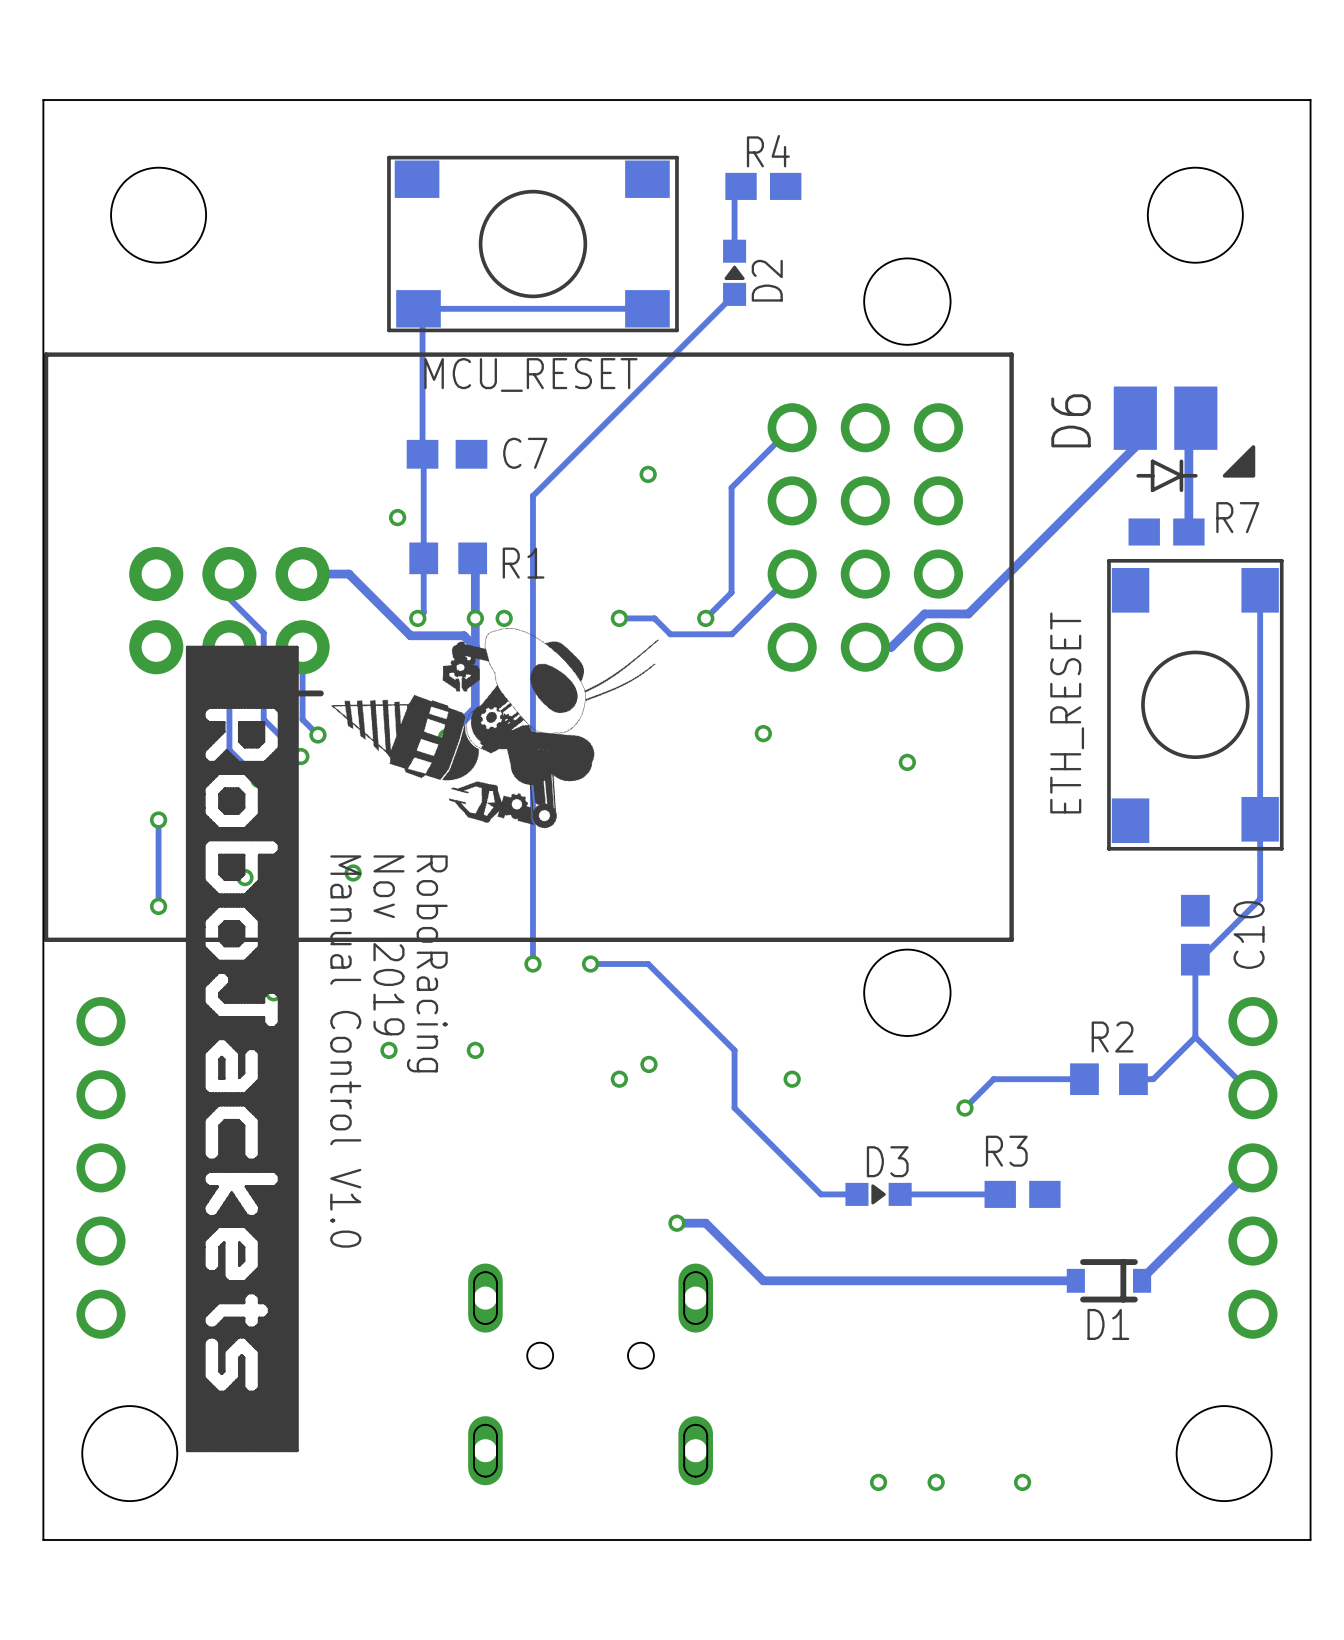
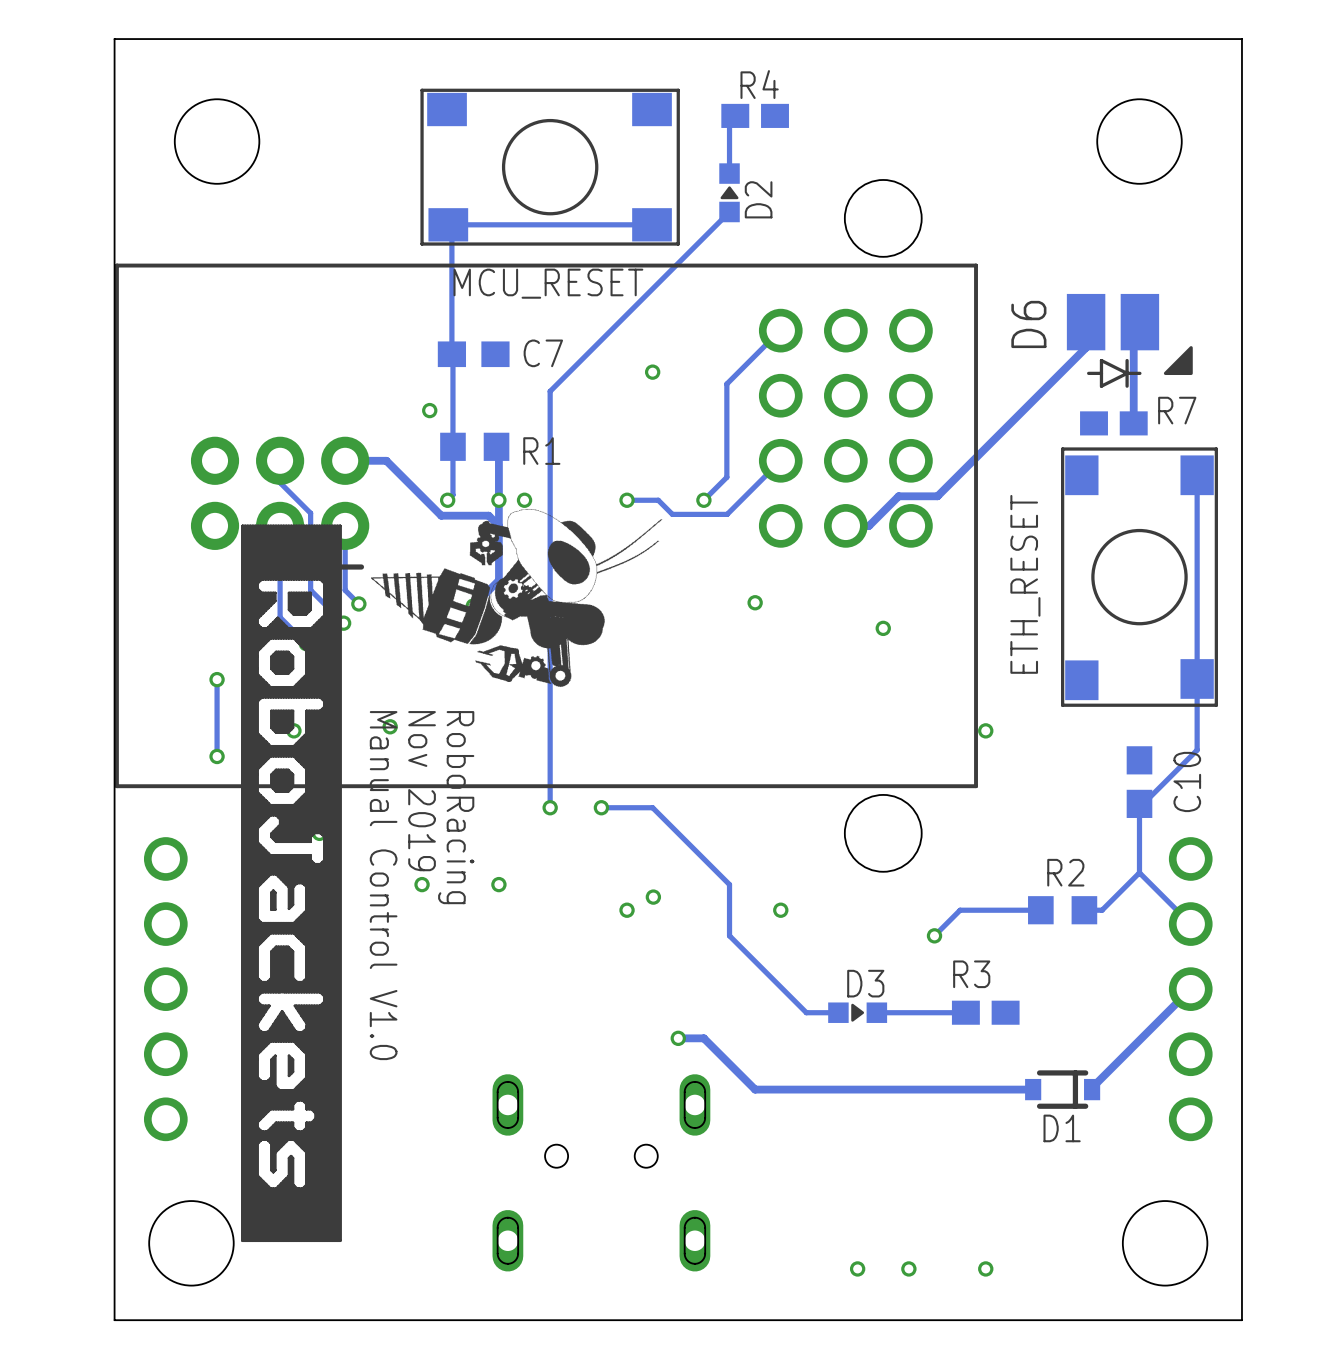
via: none -> (985, 730)

